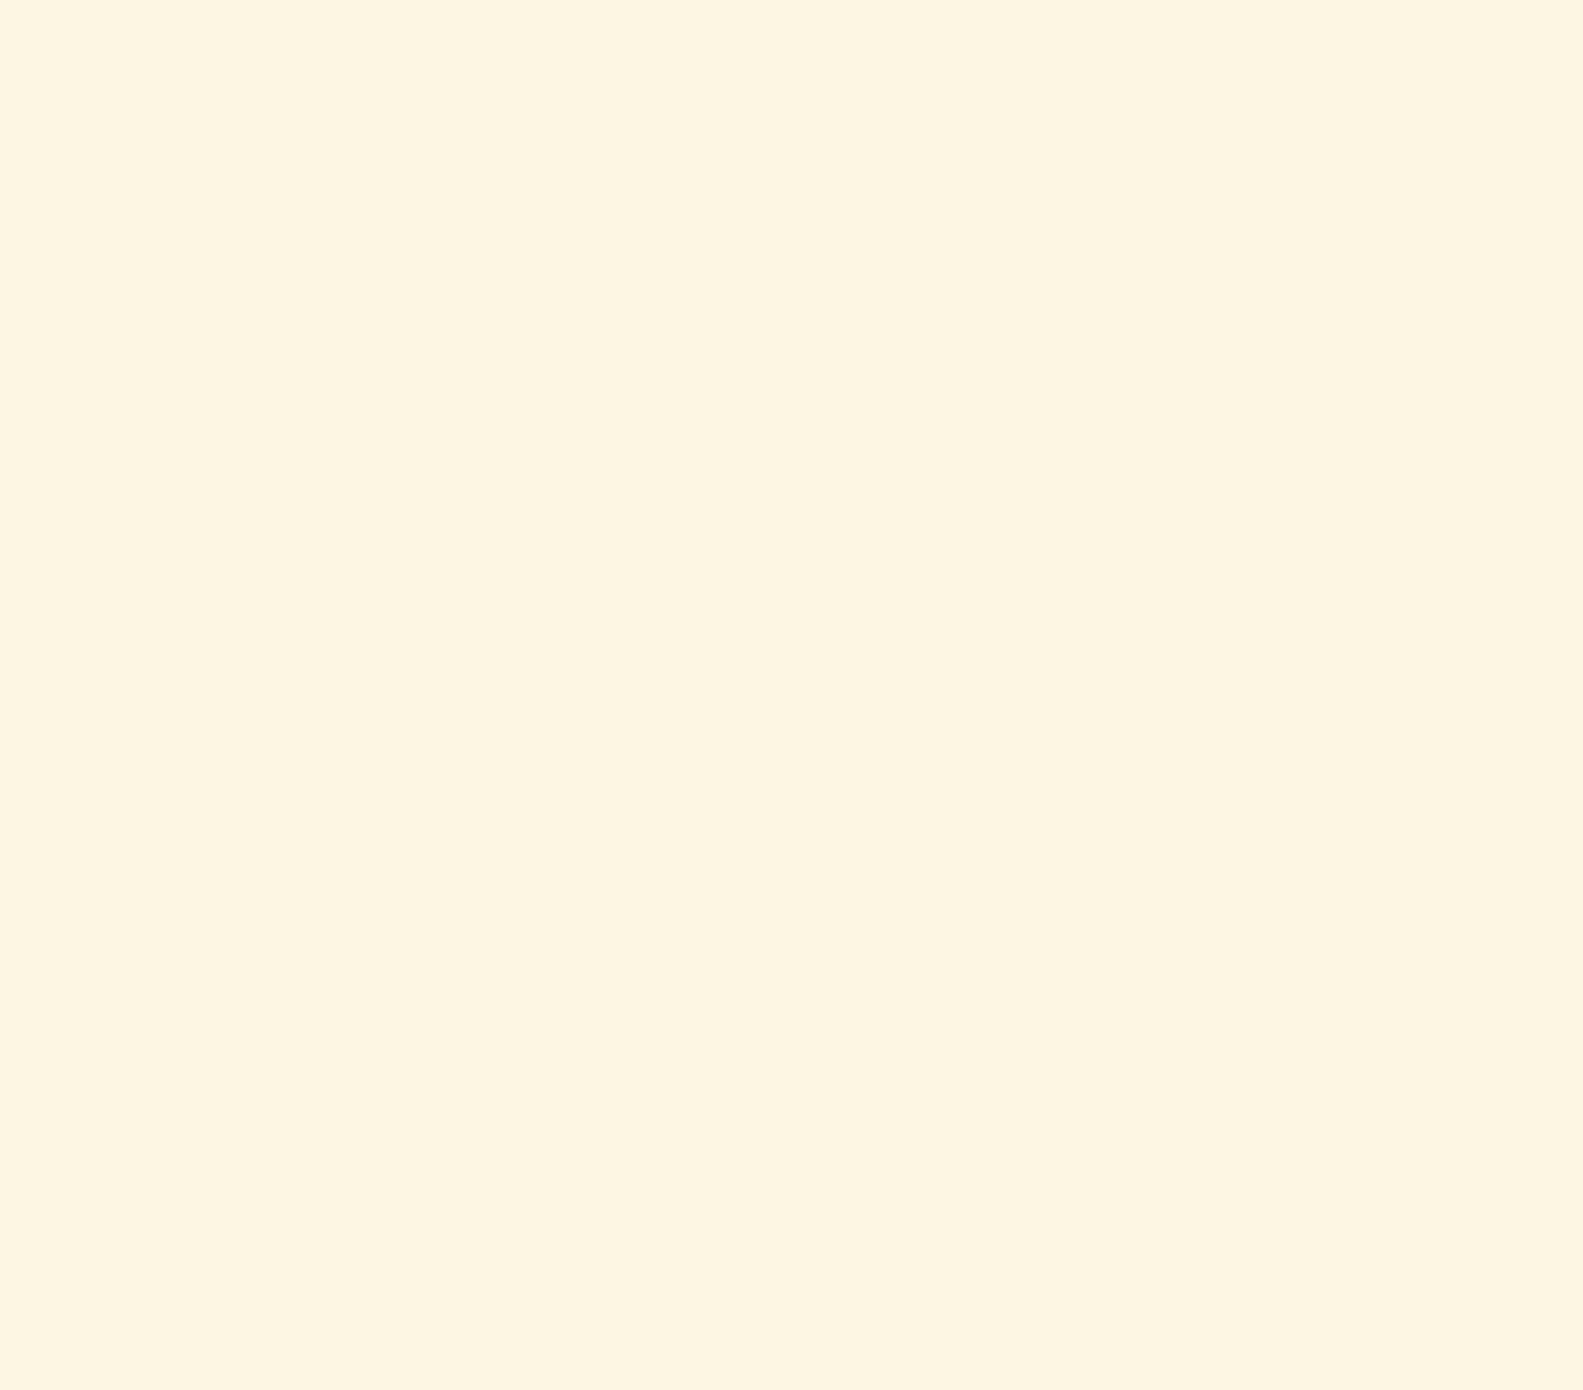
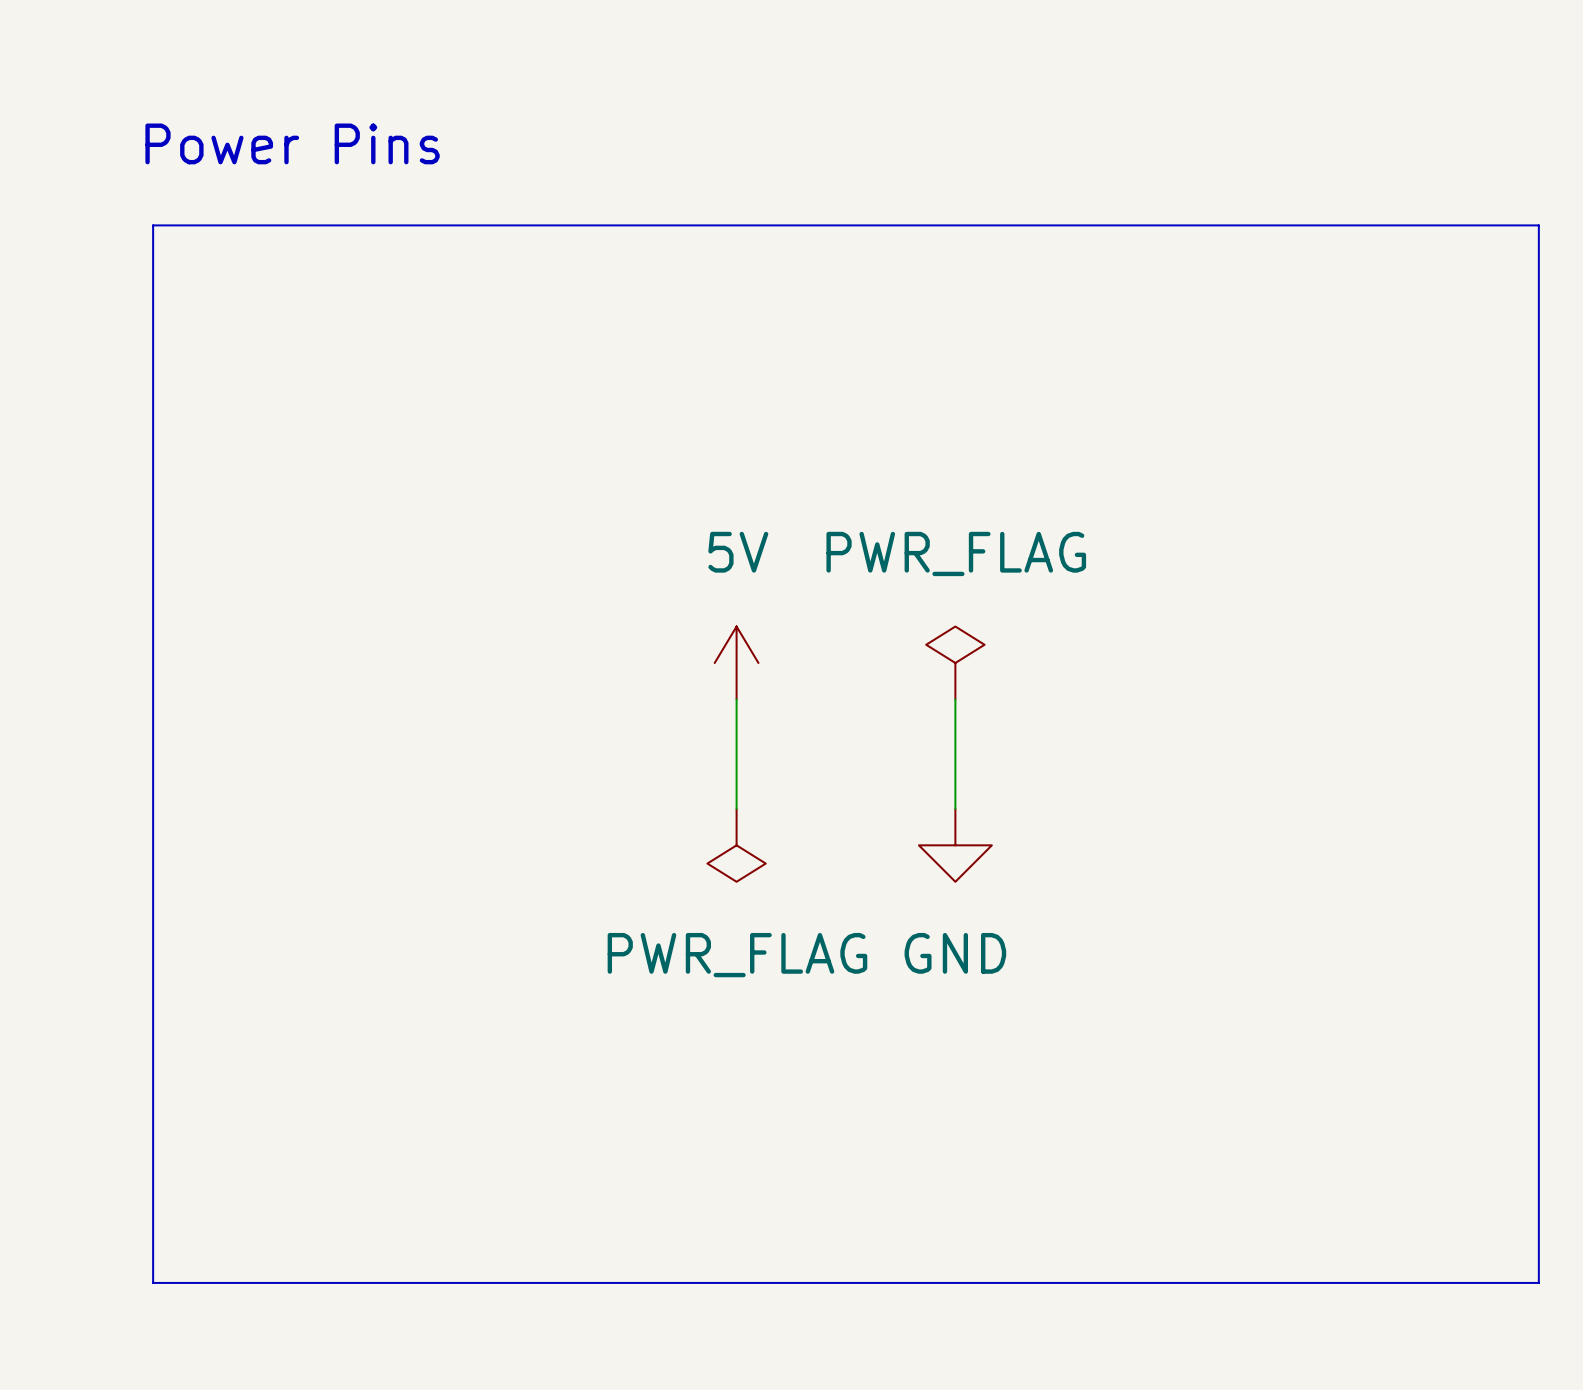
text: none -> Power Pins (292, 143)
line: none -> (153, 225) (1538, 225) (1538, 1282) (153, 1282) (153, 225)
power symbol: none -> 5V (736, 662)
power symbol: none -> PWR_FLAG (955, 662)
wire: none -> (736, 699) (736, 808)
wire: none -> (955, 699) (955, 808)
power symbol: none -> PWR_FLAG (736, 845)
power symbol: none -> GND (955, 845)

